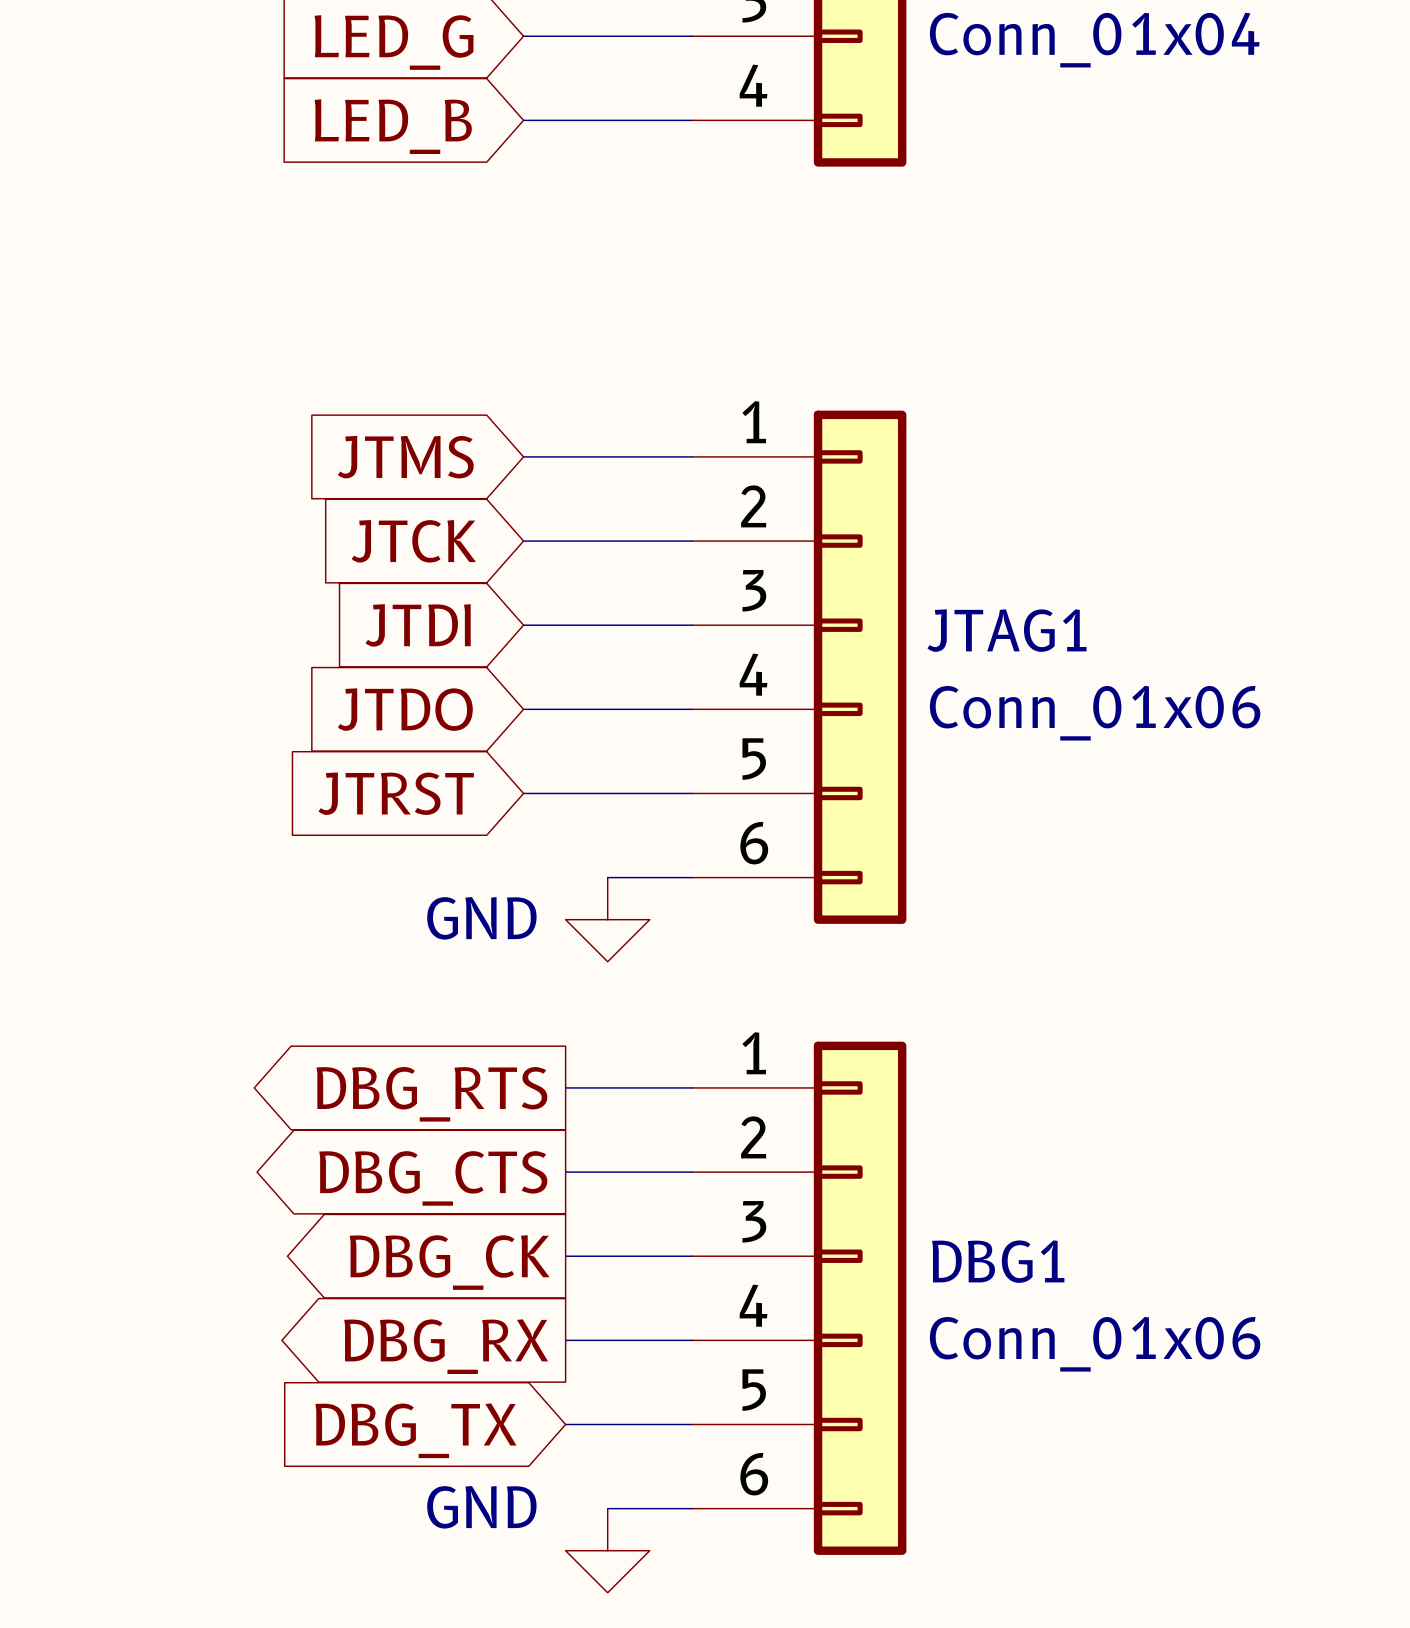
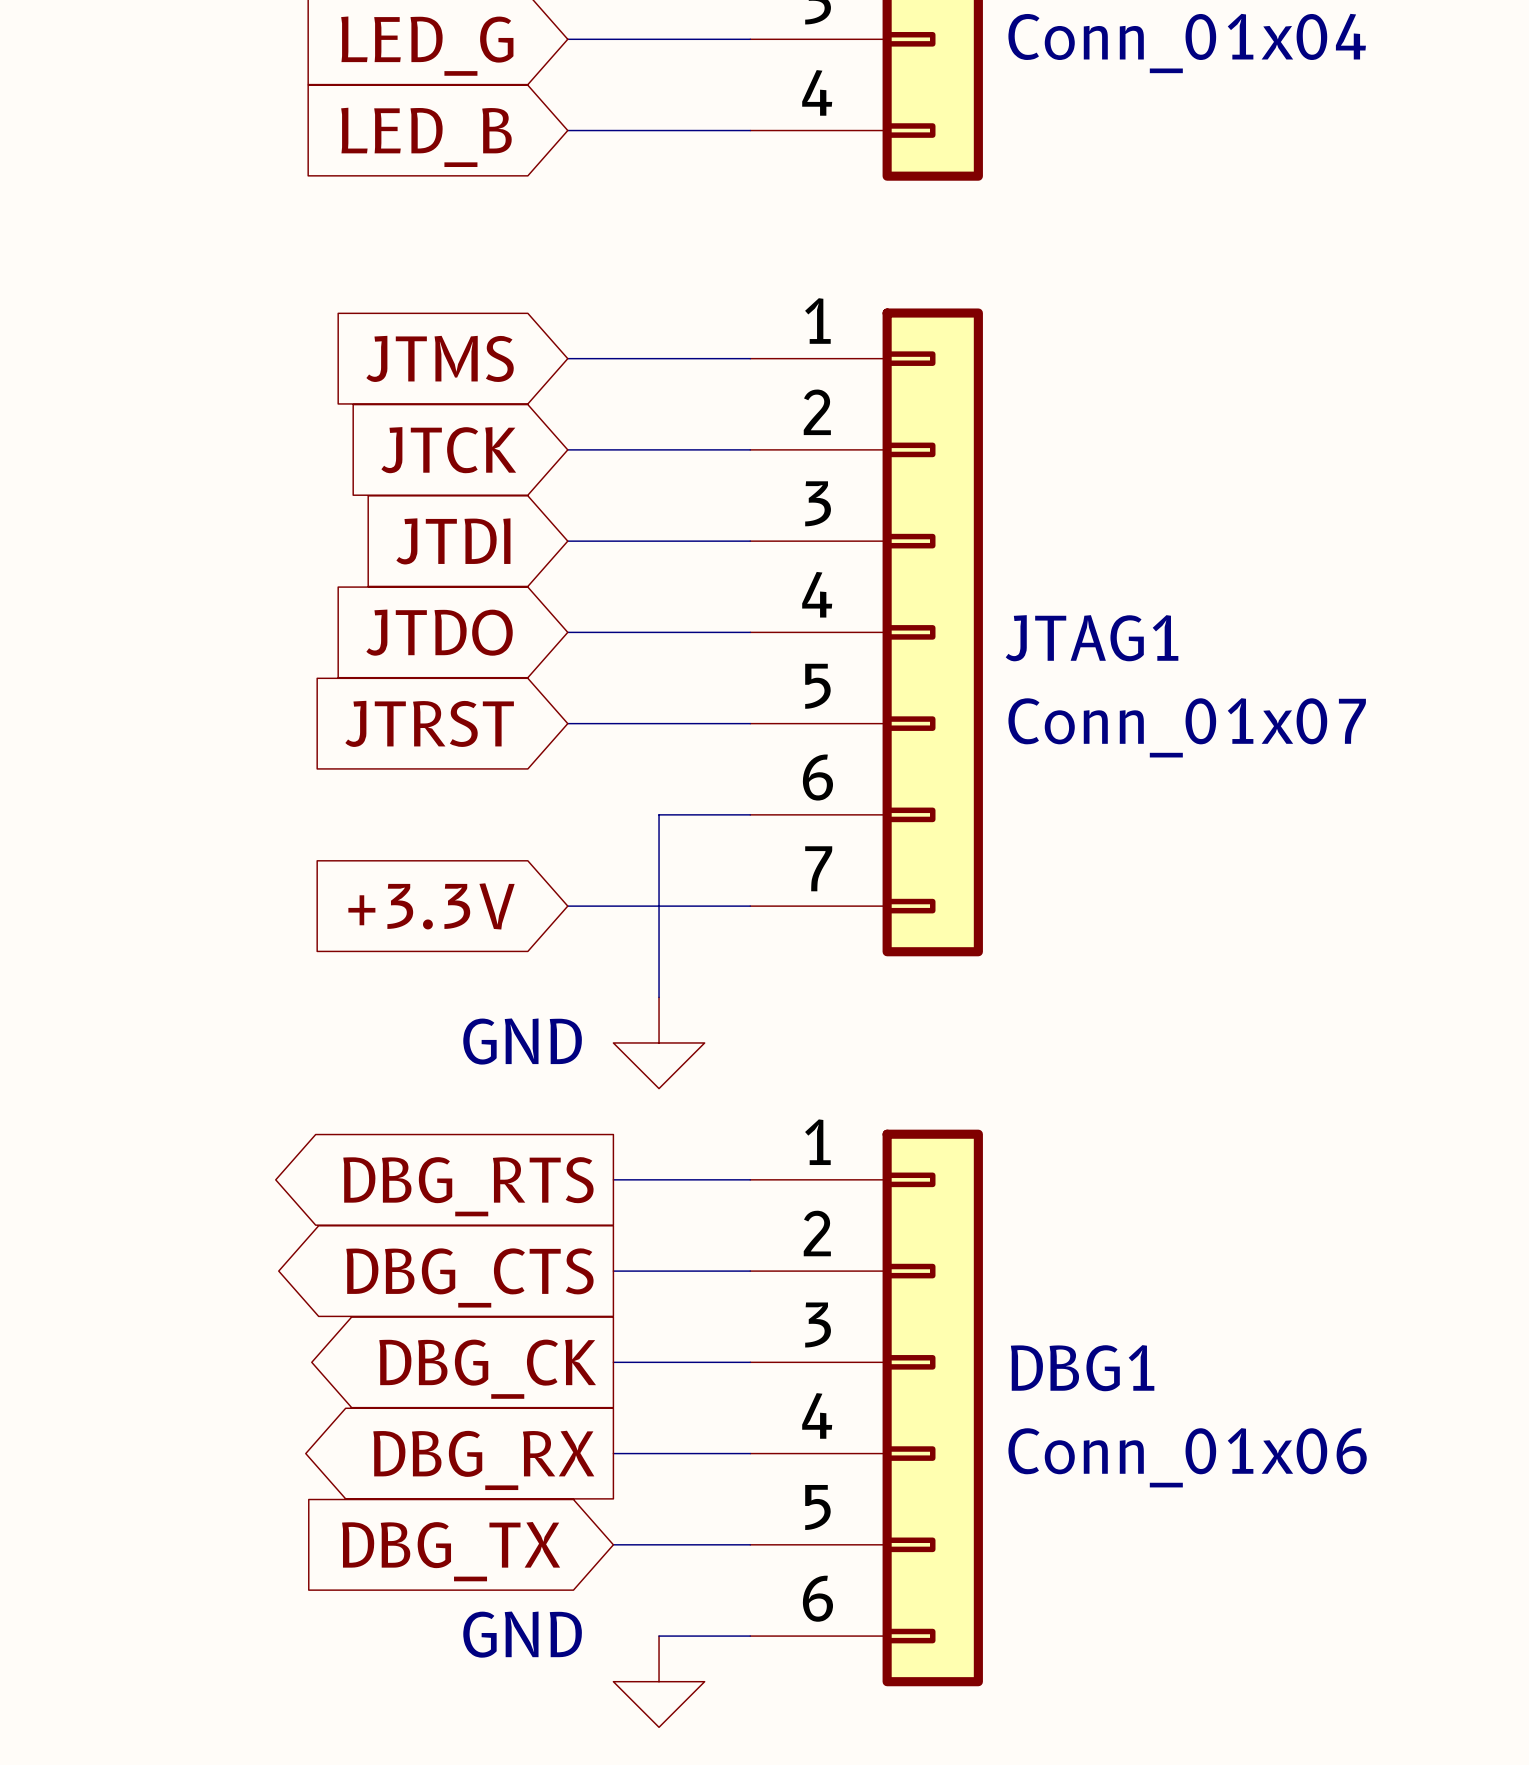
JTAG1 symbol: [691, 410, 907, 924] -> [750, 308, 983, 957]
wire: (523, 456) (691, 456) -> (567, 358) (750, 358)
global label position: JTMS (405, 457) -> JTMS (440, 358)
global label position: JTCK (413, 541) -> JTCK (448, 450)
wire: (523, 541) (691, 541) -> (567, 449) (750, 449)
global label position: JTDI (418, 625) -> JTDI (453, 541)
wire: (523, 625) (691, 625) -> (567, 541) (750, 541)
global label position: JTDO (405, 709) -> JTDO (439, 632)
wire: (523, 709) (691, 709) -> (567, 632) (750, 632)
JTAG1 value: Conn_01x06 (1095, 713) -> Conn_01x07 (1187, 727)
wire: none -> (750, 814) (659, 814) (659, 997)
global label position: JTRST (396, 793) -> JTRST (429, 723)
wire: (523, 793) (691, 793) -> (567, 723) (750, 723)
global label: none -> +3.3V (431, 906)
wire: none -> (567, 906) (750, 906)
wire: (607, 877) (691, 877) -> none
power symbol position: GND (607, 919) -> GND (659, 1042)

